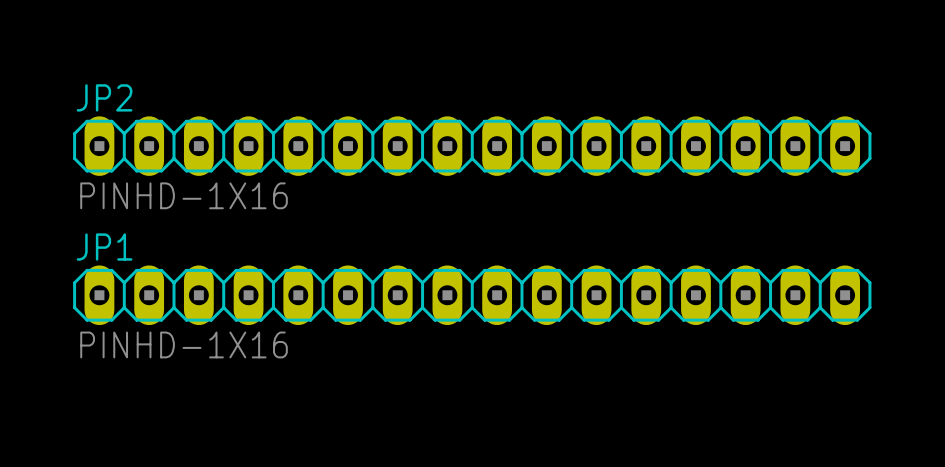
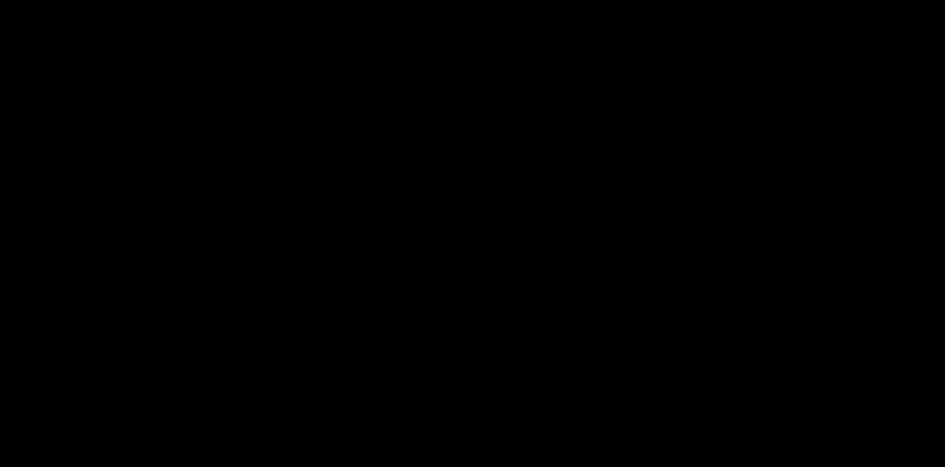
JP2: PINHD-1X16 (472, 146) -> none
JP1: PINHD-1X16 (472, 295) -> none

